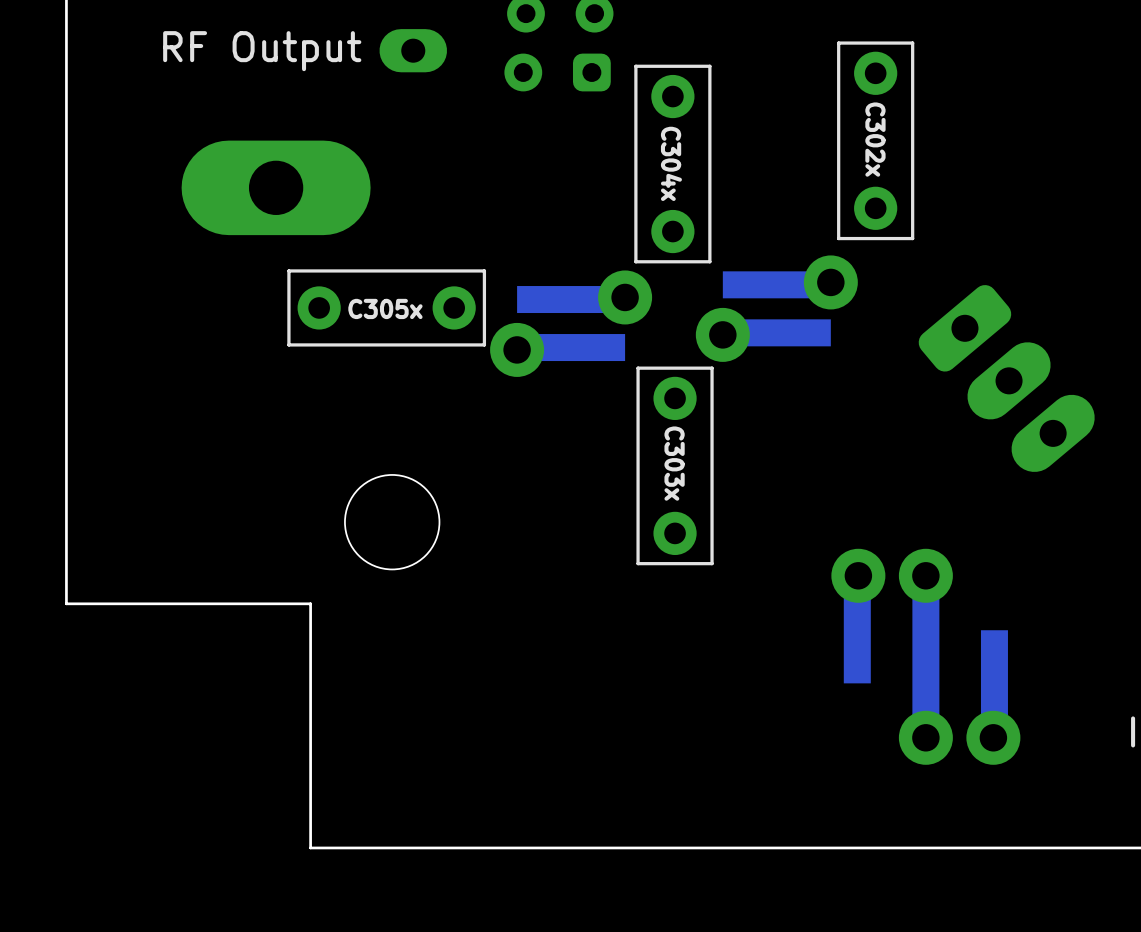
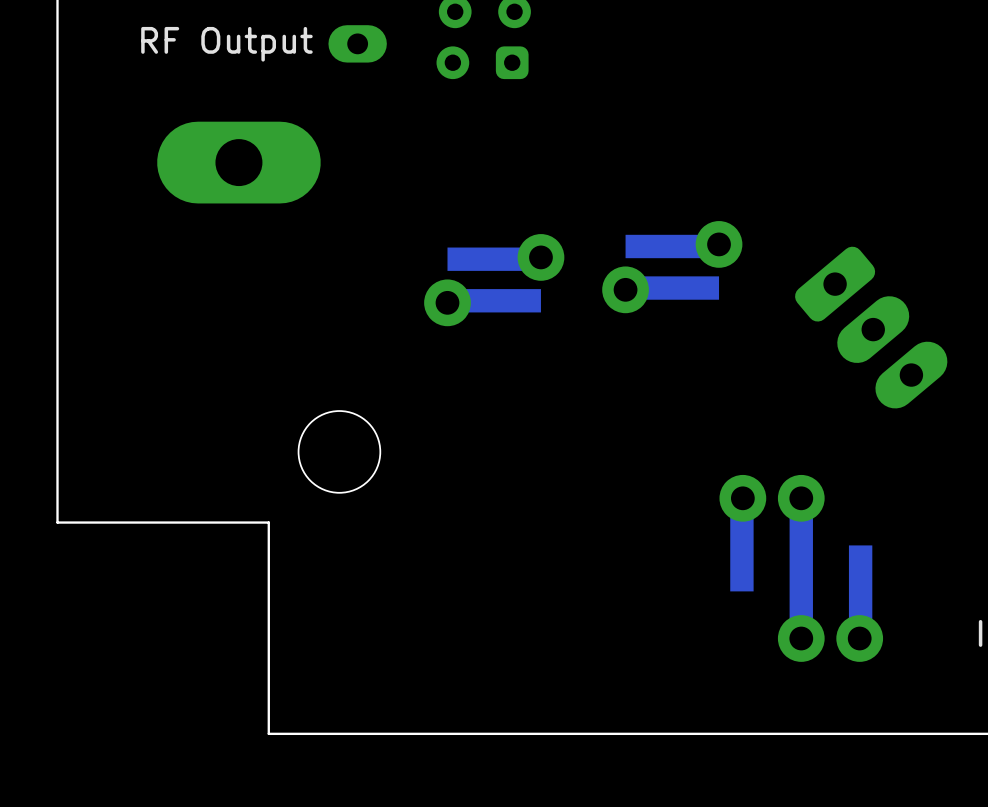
C302x: (875, 140) -> none
C304x: (672, 164) -> none
C305x: (386, 307) -> none
C303x: (675, 465) -> none

